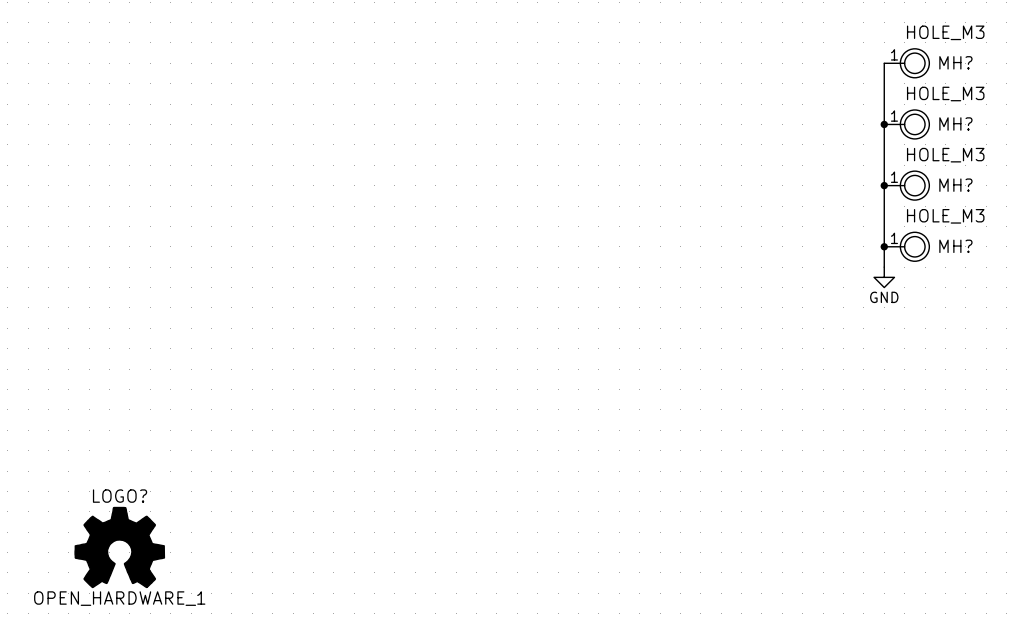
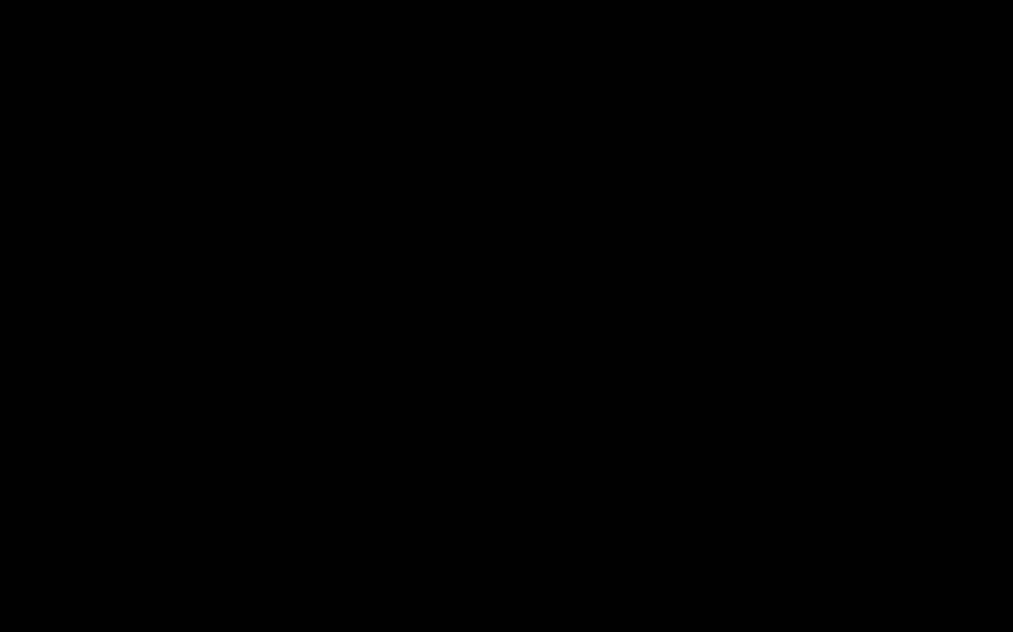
wire: (884, 63) (884, 267) -> none
MH?: HOLE_M3 (906, 63) -> none
junction: (884, 124) -> none
MH?: HOLE_M3 (906, 124) -> none
junction: (884, 185) -> none
MH?: HOLE_M3 (906, 185) -> none
junction: (884, 246) -> none
MH?: HOLE_M3 (906, 246) -> none
power symbol: GND (884, 277) -> none
LOGO?: OPEN_HARDWARE_1 (119, 547) -> none

